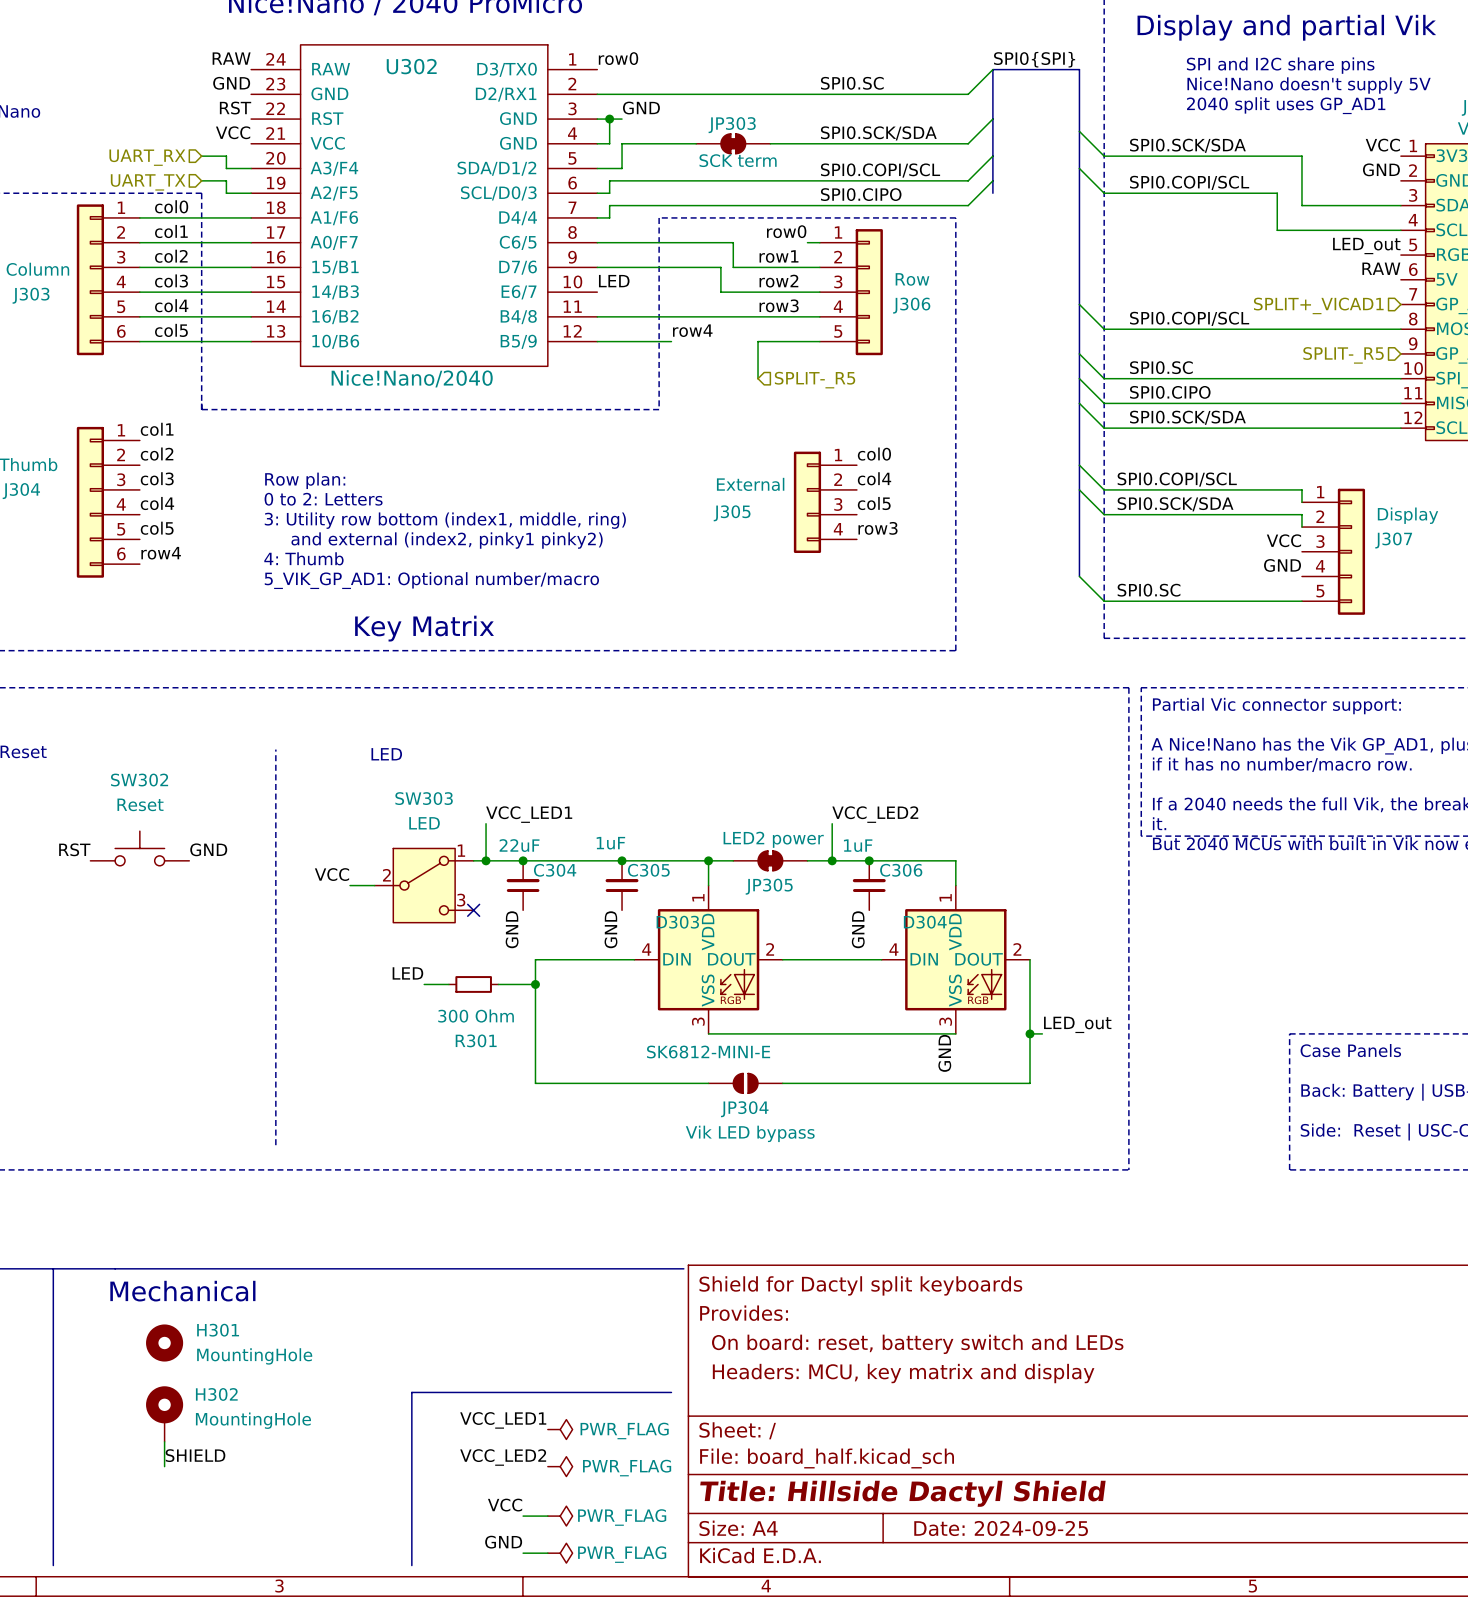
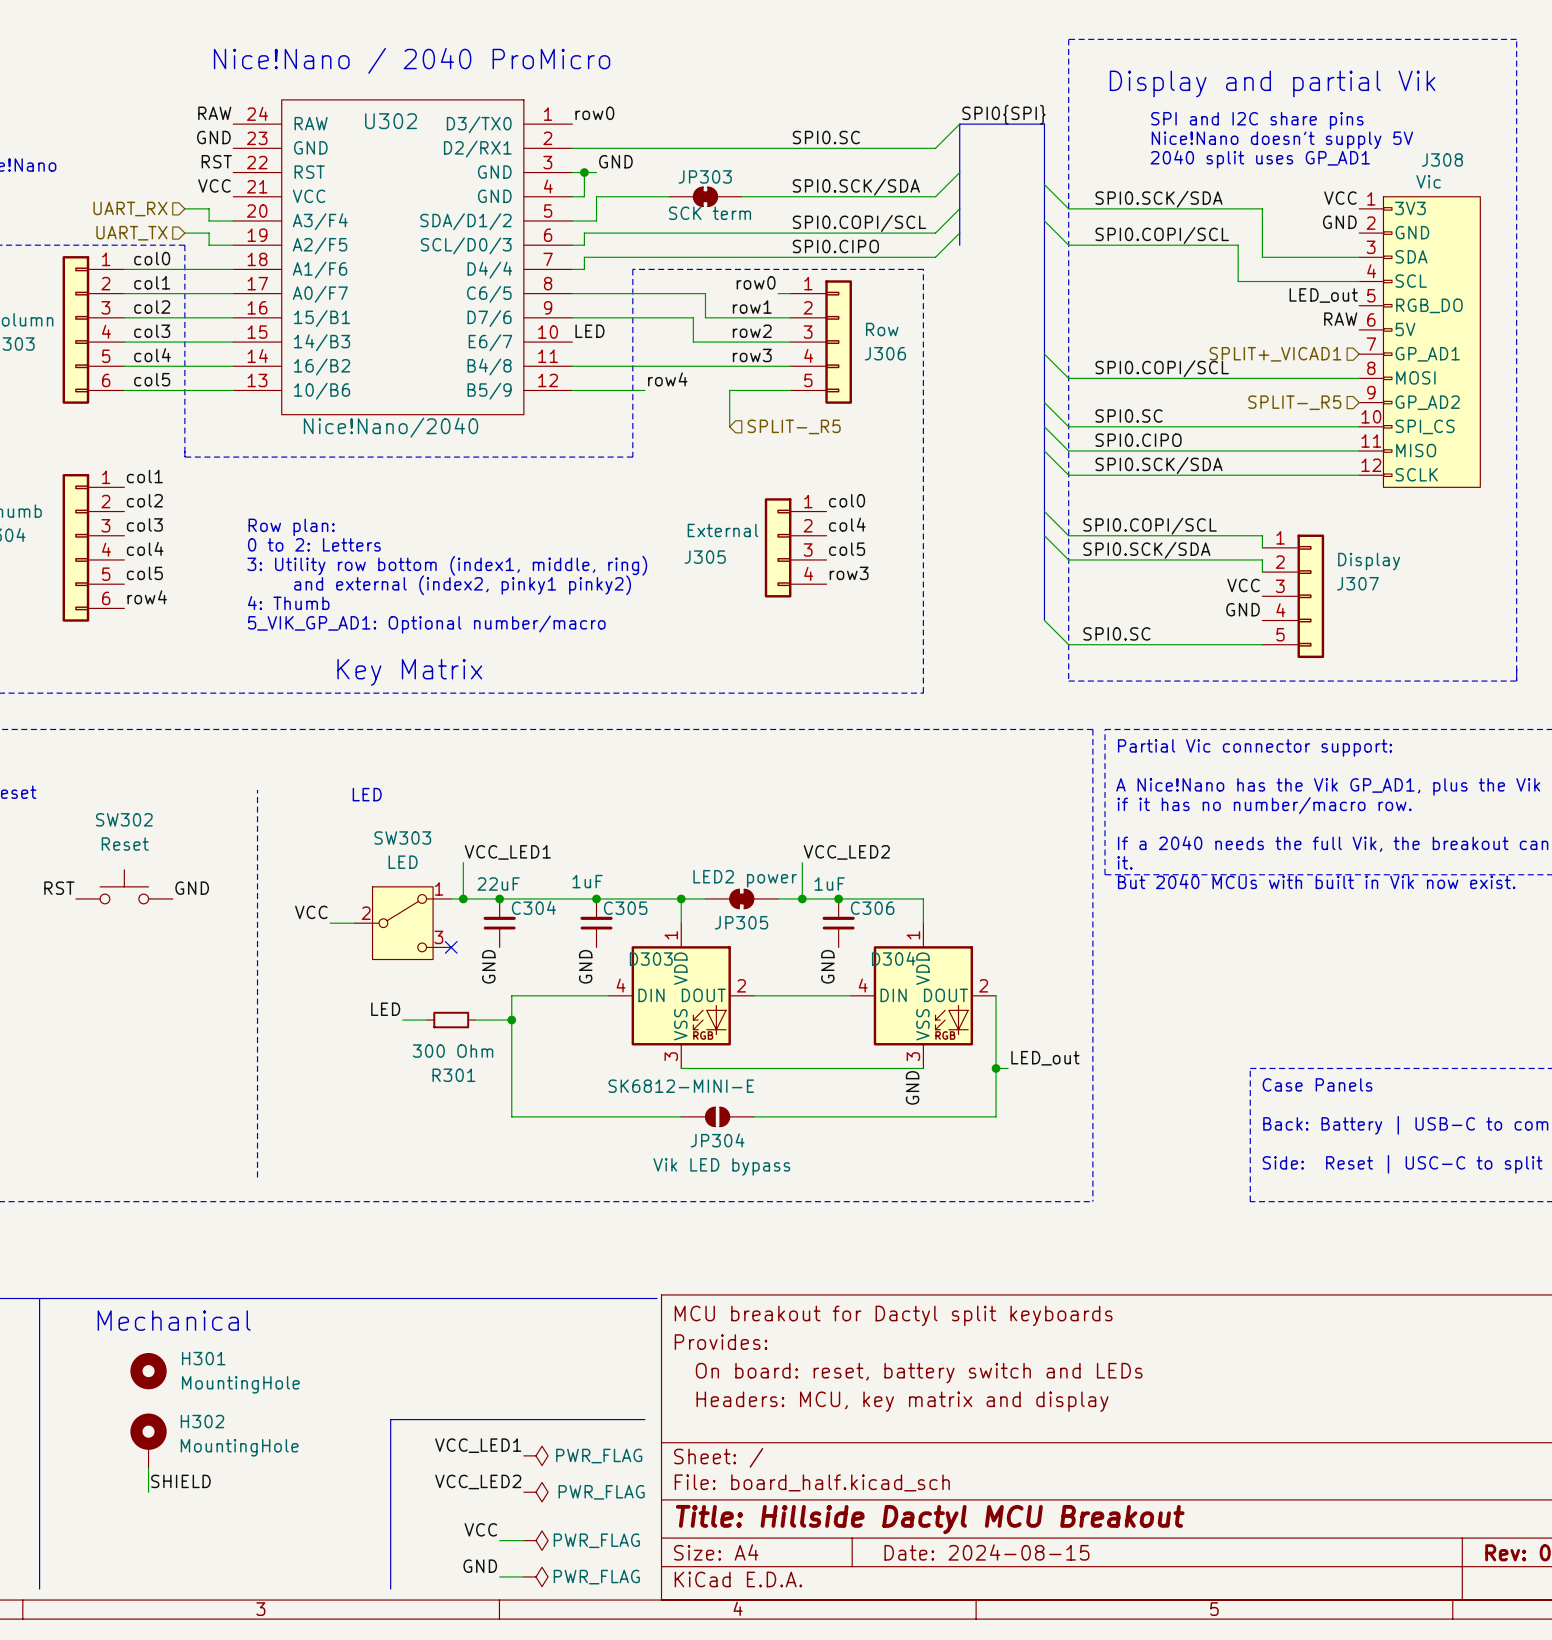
title block: Shield for Dactyl split keyboards (860, 1285) -> MCU breakout for Dactyl split keyboards (893, 1315)
title block: Title: Hillside Dactyl Shield (902, 1493) -> Title: Hillside Dactyl MCU Breakout (930, 1519)
title block: Date: 2024-09-25 (1001, 1528) -> Date: 2024-08-15 (986, 1552)

